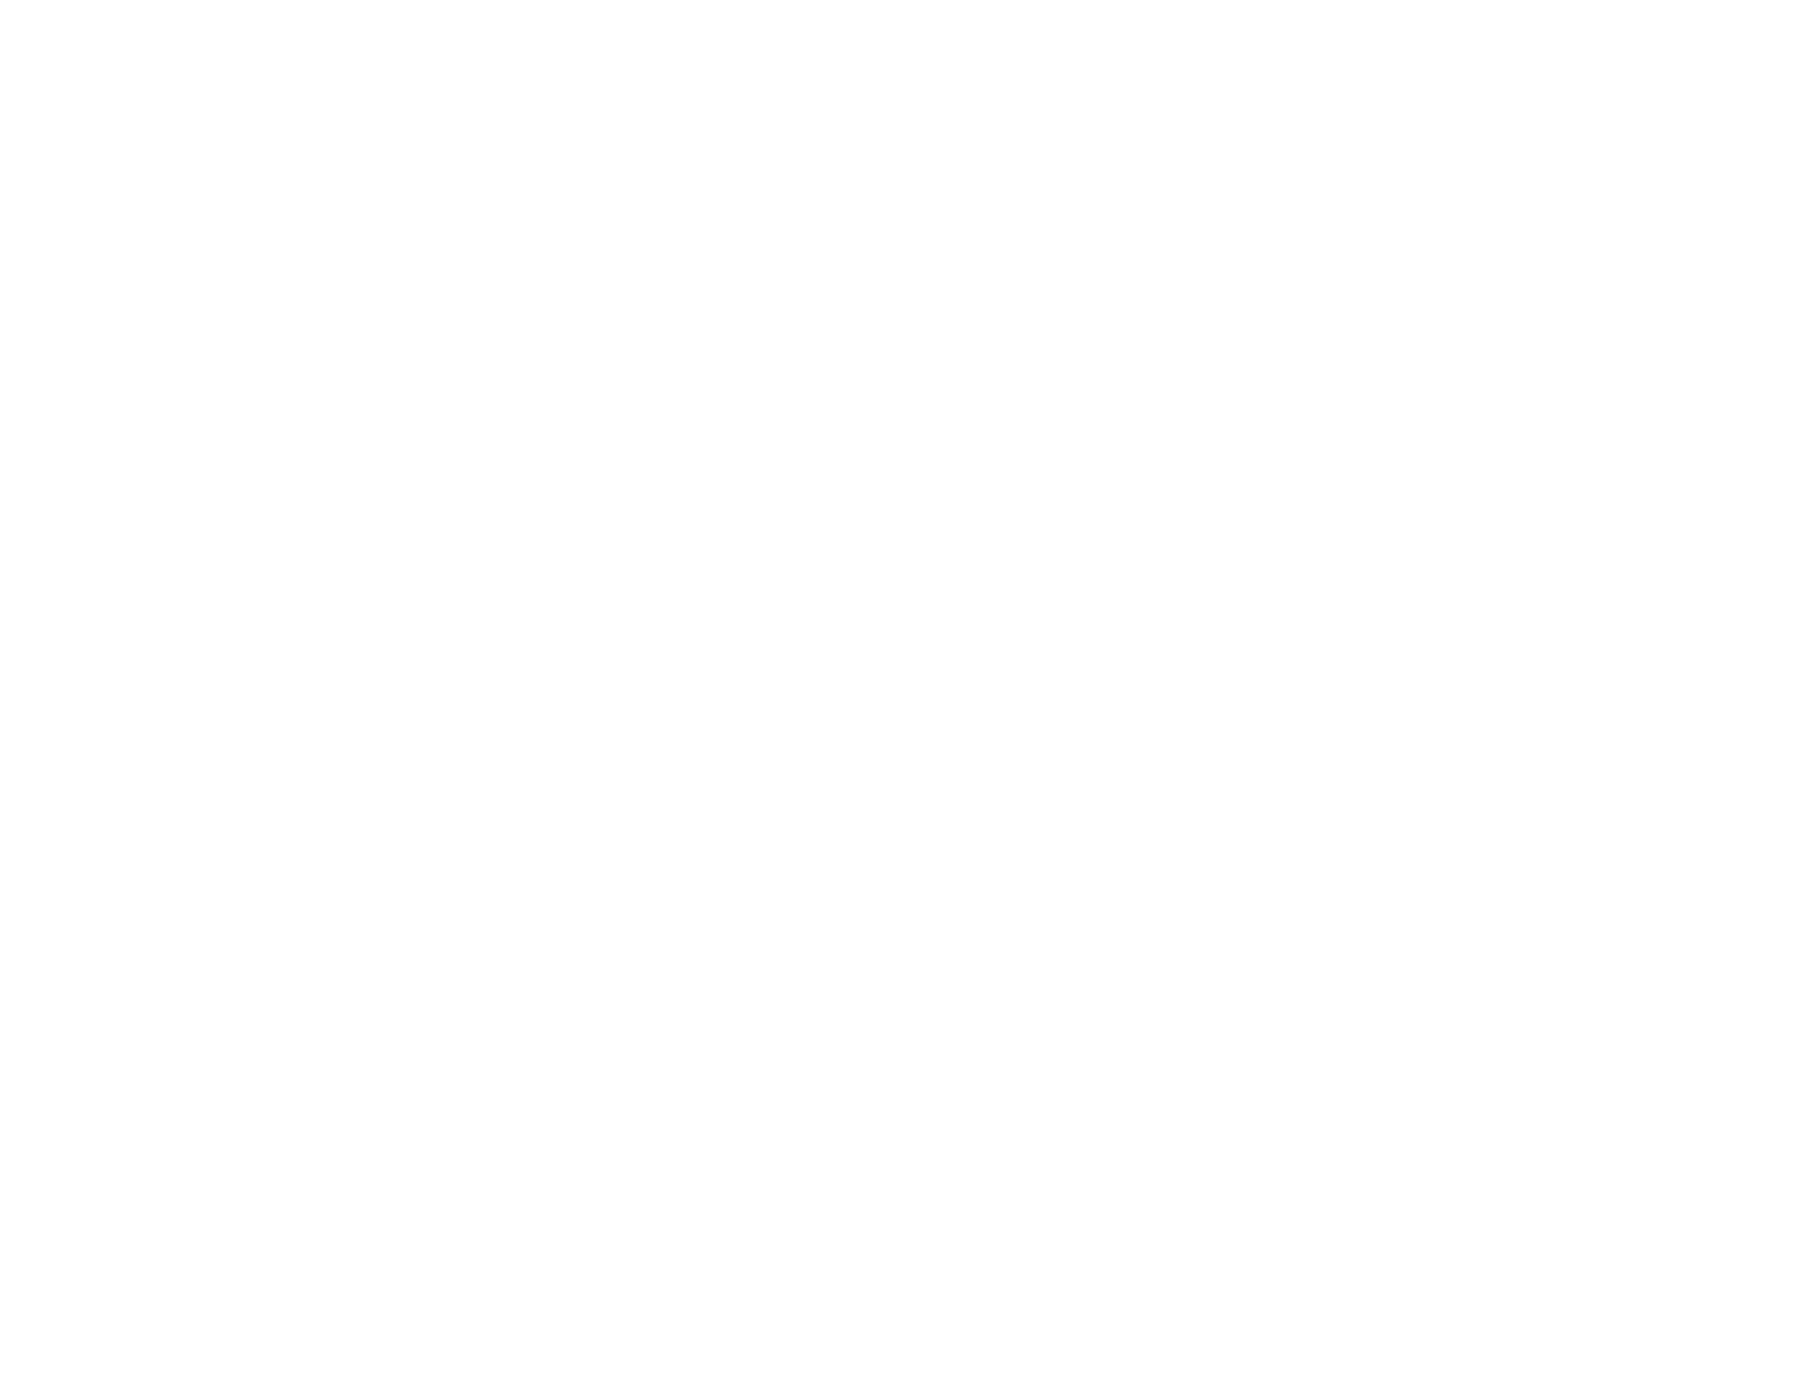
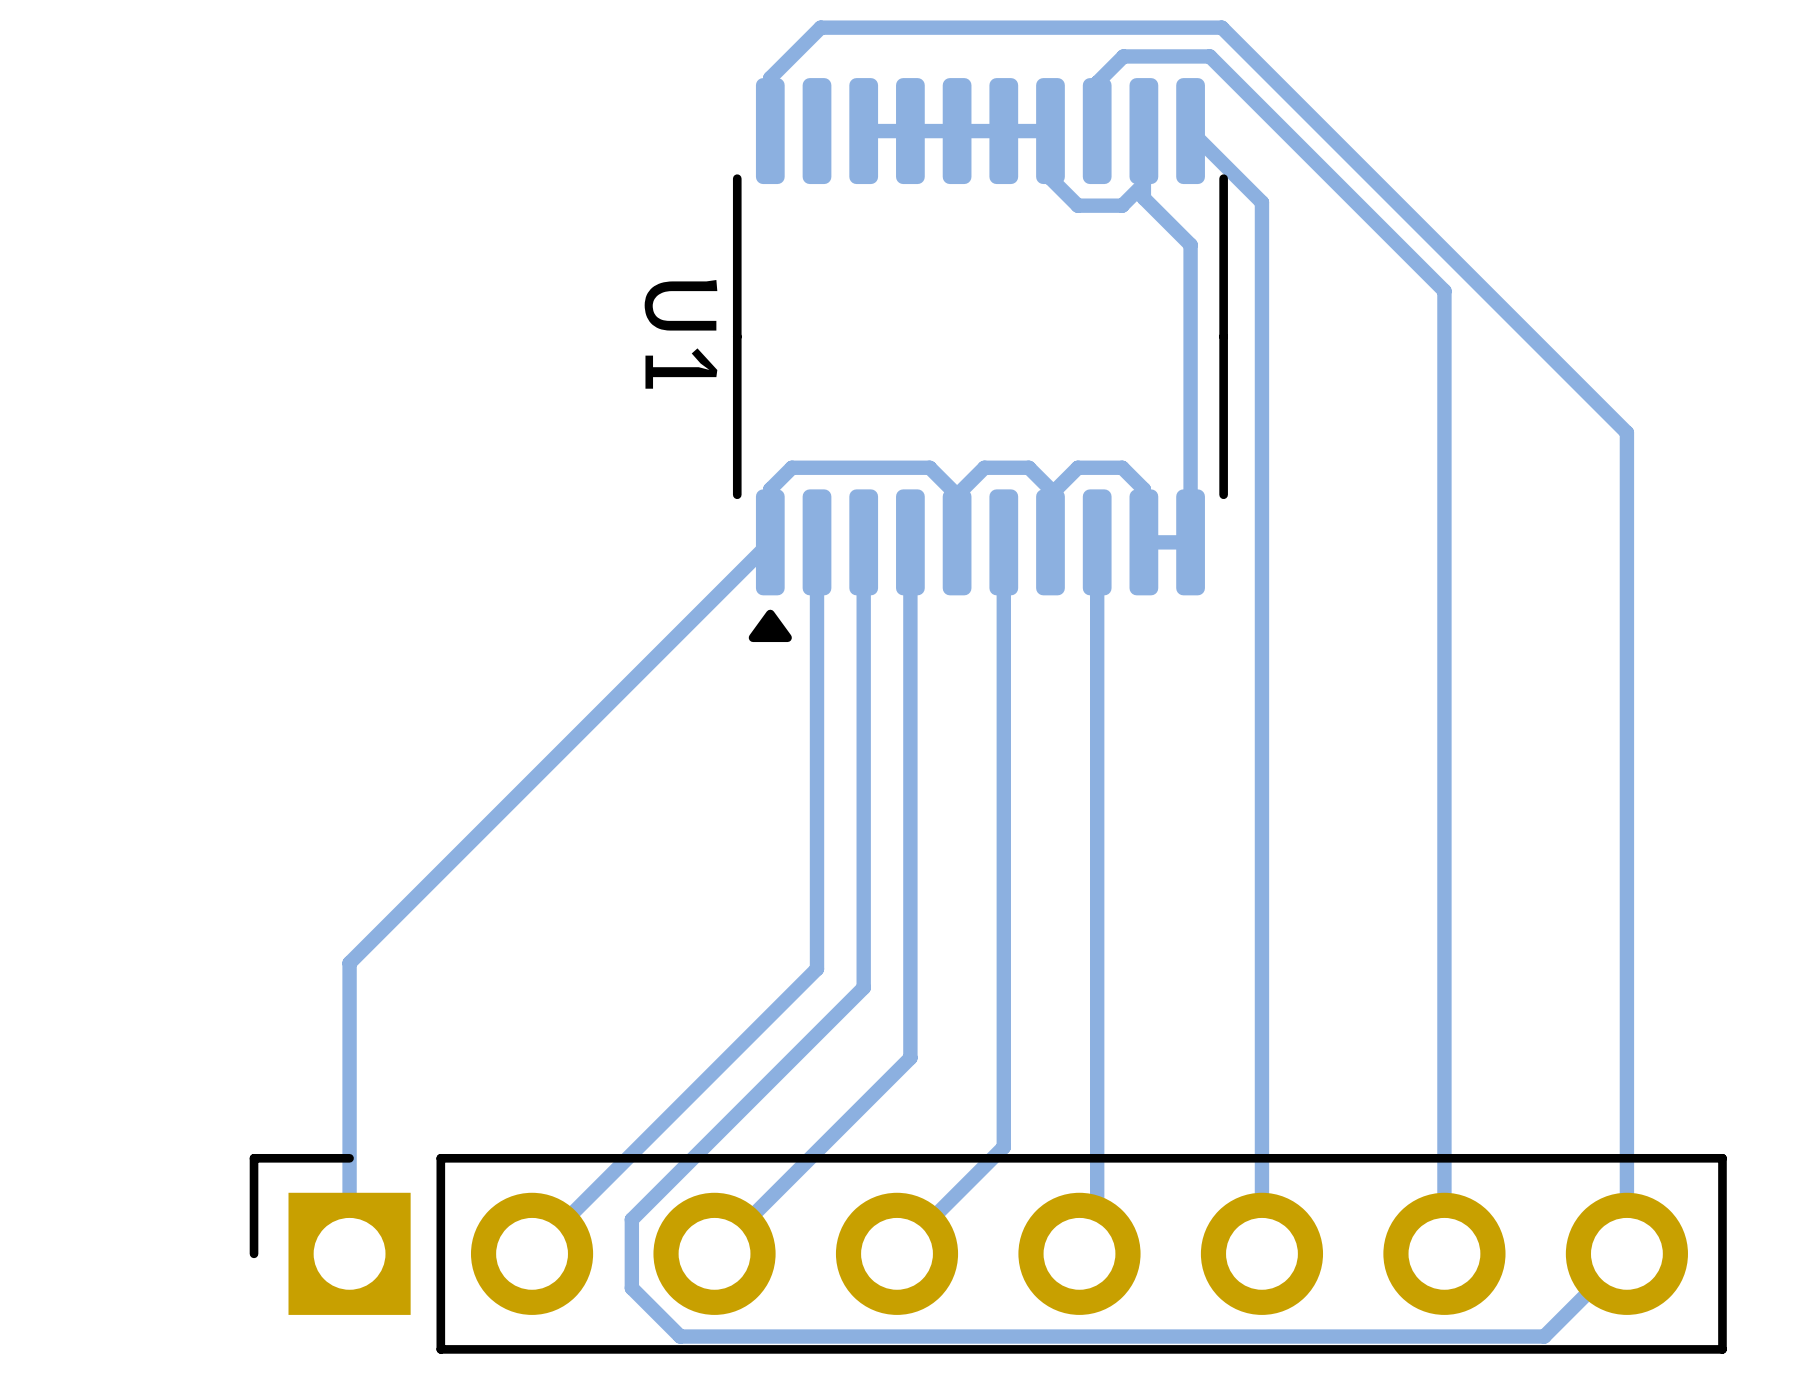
track: none -> (770, 131) (770, 78) (820, 27) (1221, 27) (1626, 432) (1626, 1253) (1544, 1336) (680, 1336) (631, 1288) (631, 1219) (863, 987) (863, 542)
track: none -> (863, 131) (1050, 131) (1050, 178) (1077, 205) (1122, 205) (1143, 184)
track: none -> (1097, 131) (1097, 82) (1123, 56) (1209, 56) (1444, 291) (1444, 1253)
track: none -> (1143, 131) (1143, 198) (1190, 244) (1190, 542) (1143, 542) (1143, 489) (1122, 467) (1077, 467) (1050, 495)
track: none -> (1190, 131) (1261, 202) (1261, 1253)
U1: none -> (980, 360)
track: none -> (957, 495) (984, 467) (1028, 467) (1050, 489) (1050, 542)
track: none -> (957, 495) (929, 467) (791, 467) (770, 489) (770, 542) (349, 963) (349, 1253)
track: none -> (817, 542) (817, 968) (532, 1253)
track: none -> (910, 542) (910, 1057) (714, 1253)
track: none -> (1003, 542) (1003, 1147) (897, 1253)
track: none -> (1097, 542) (1097, 1236) (1079, 1253)
part: none -> (988, 1253)

